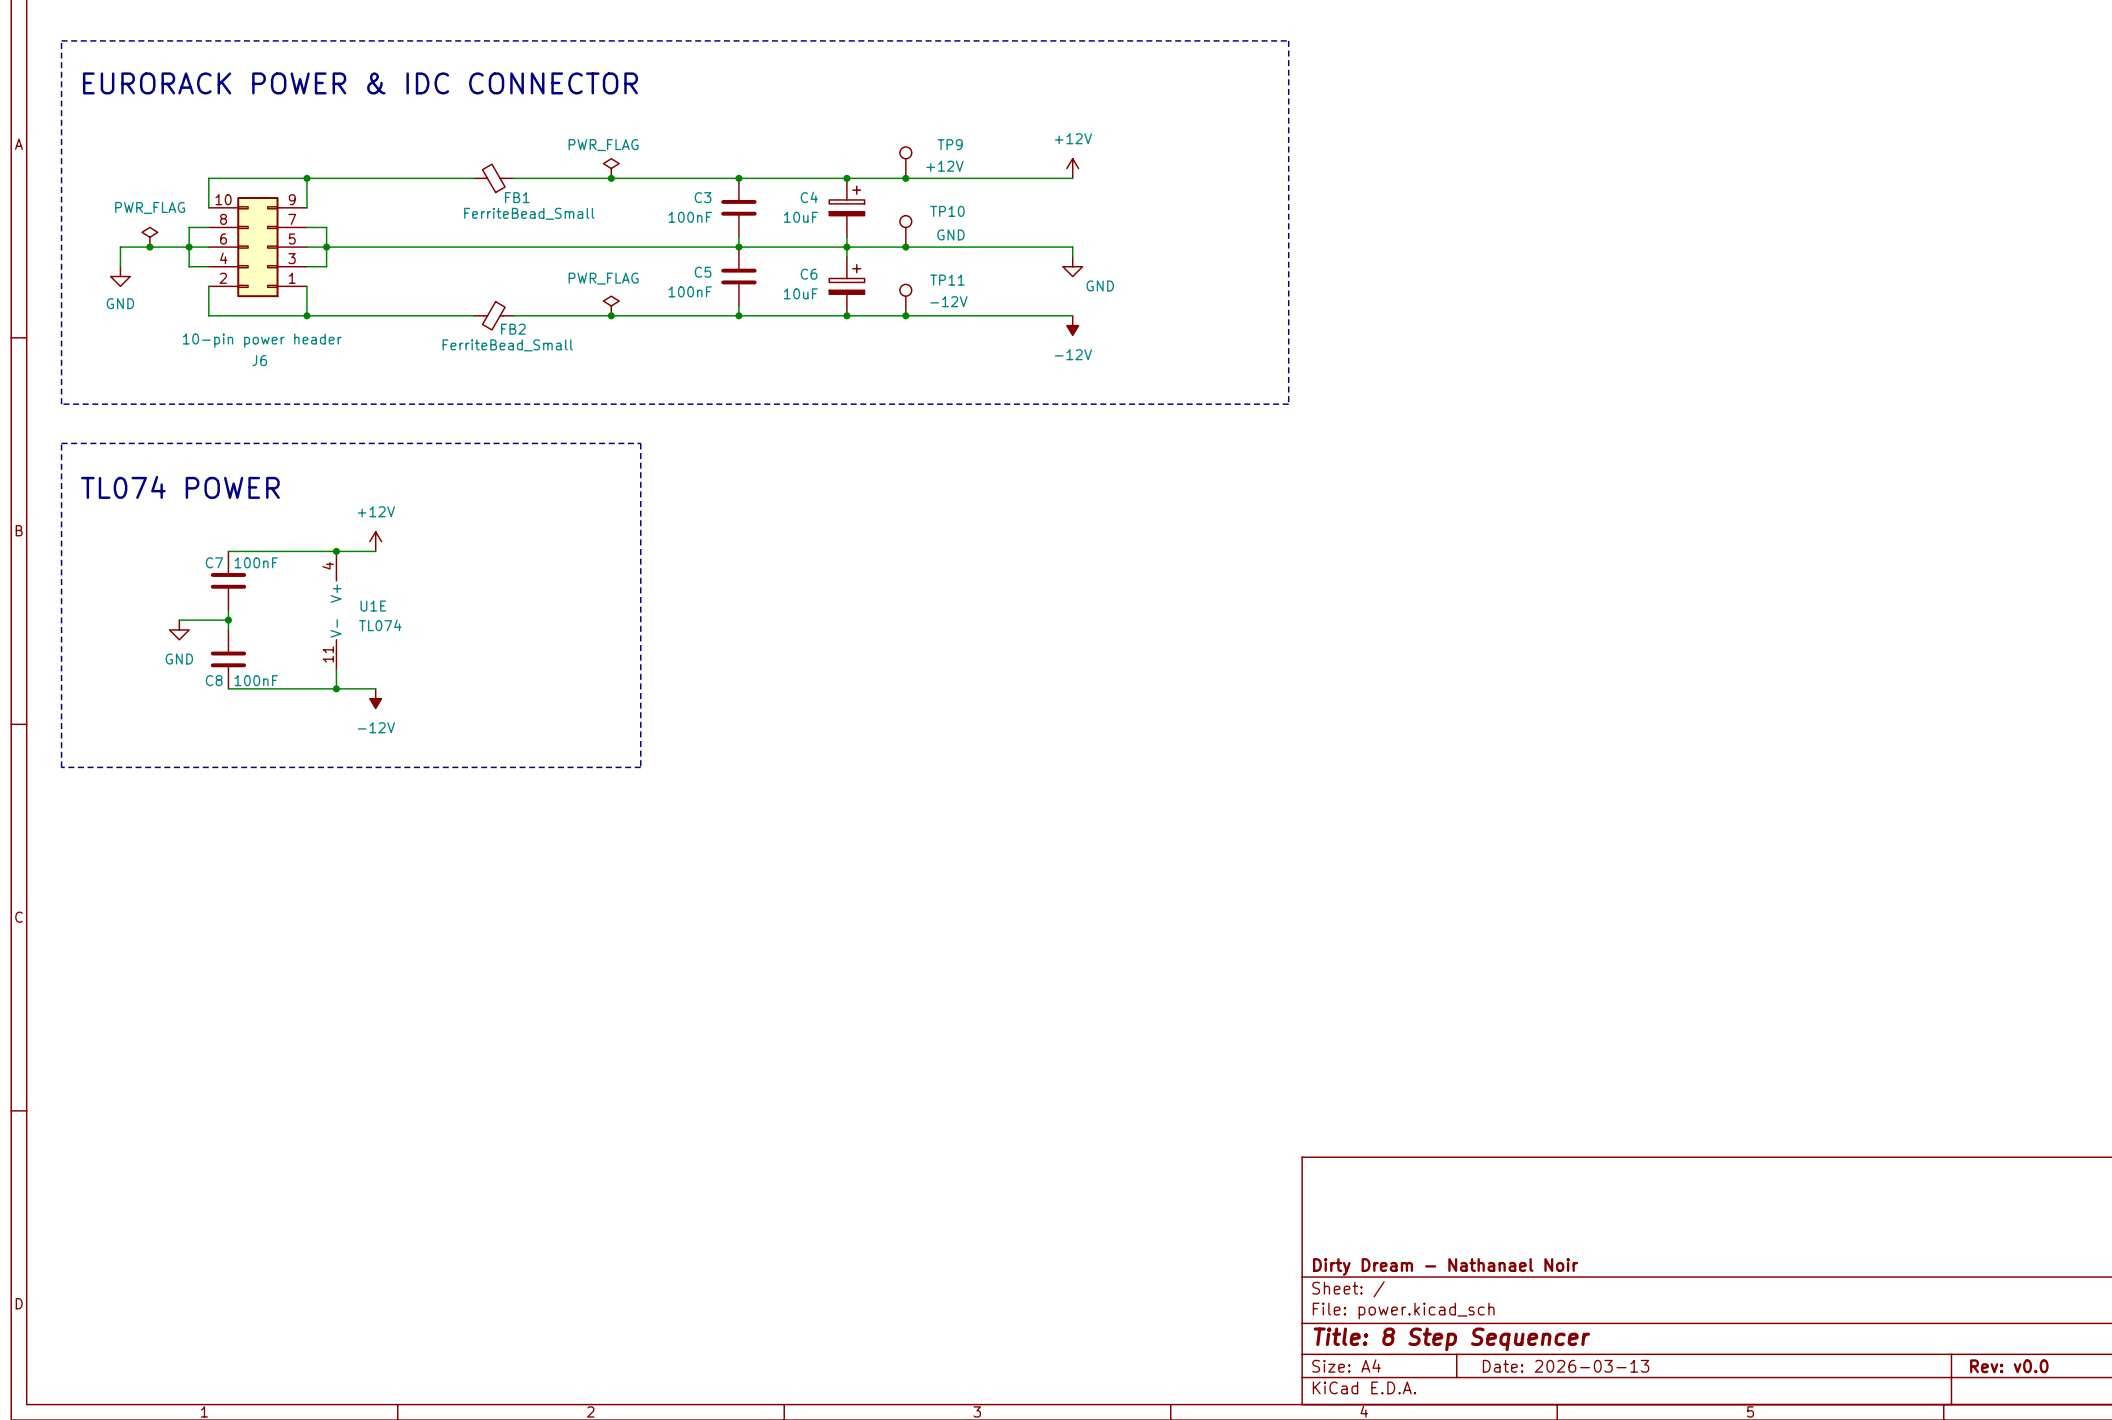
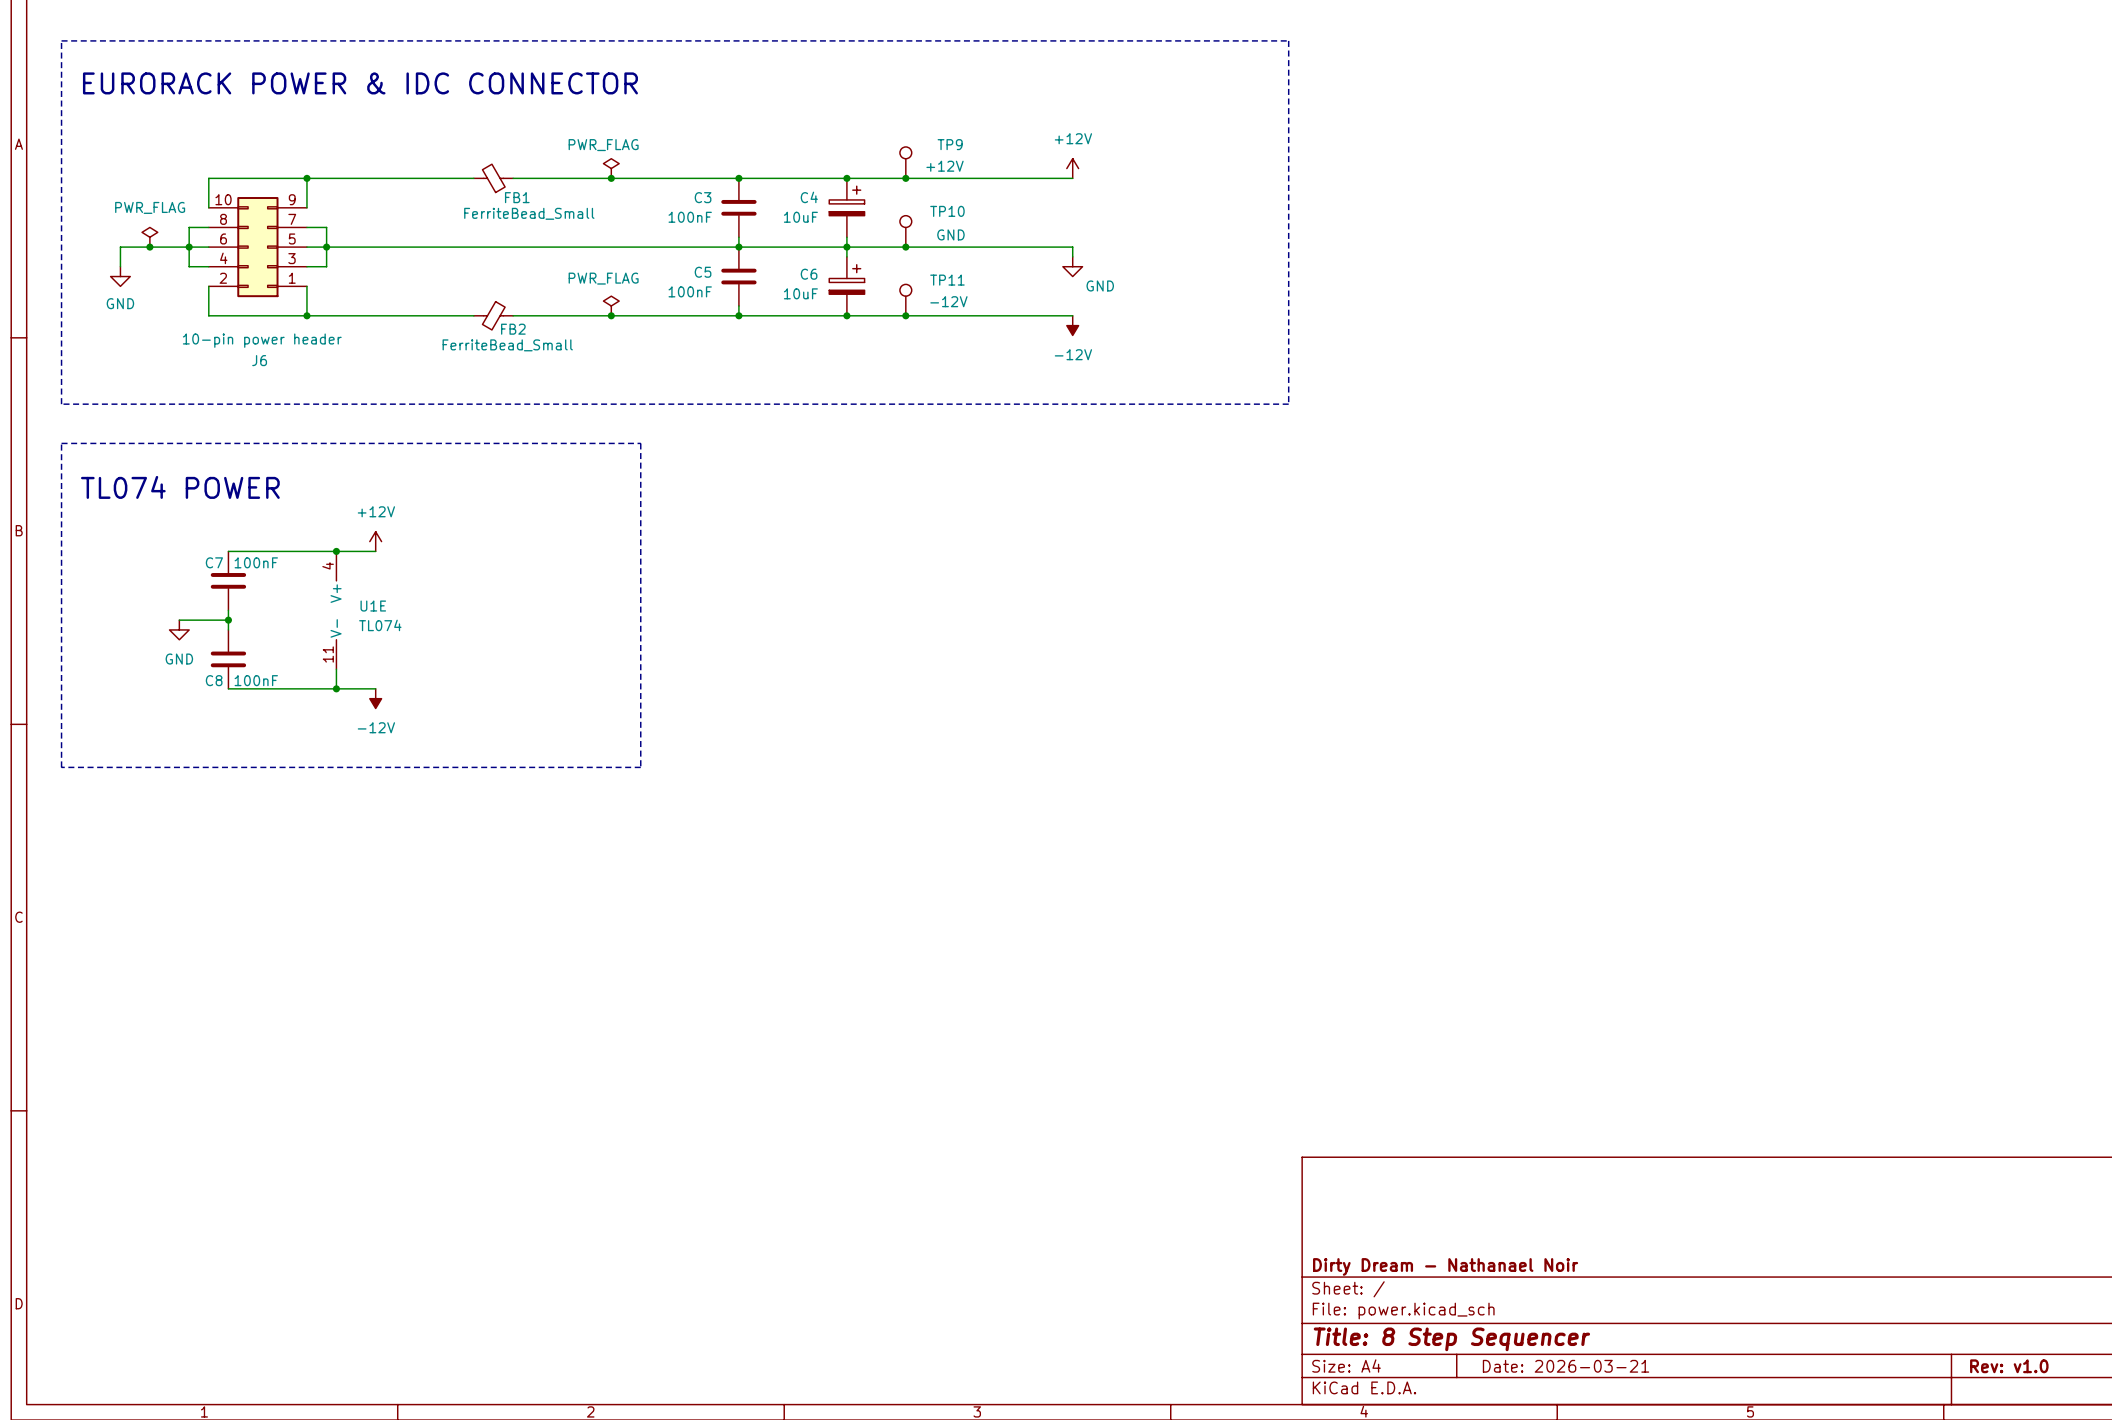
title block: Date: 2026-03-13 (1566, 1366) -> Date: 2026-03-21 (1566, 1366)
title block: Rev: v0.0 (2009, 1366) -> Rev: v1.0 (2009, 1366)

